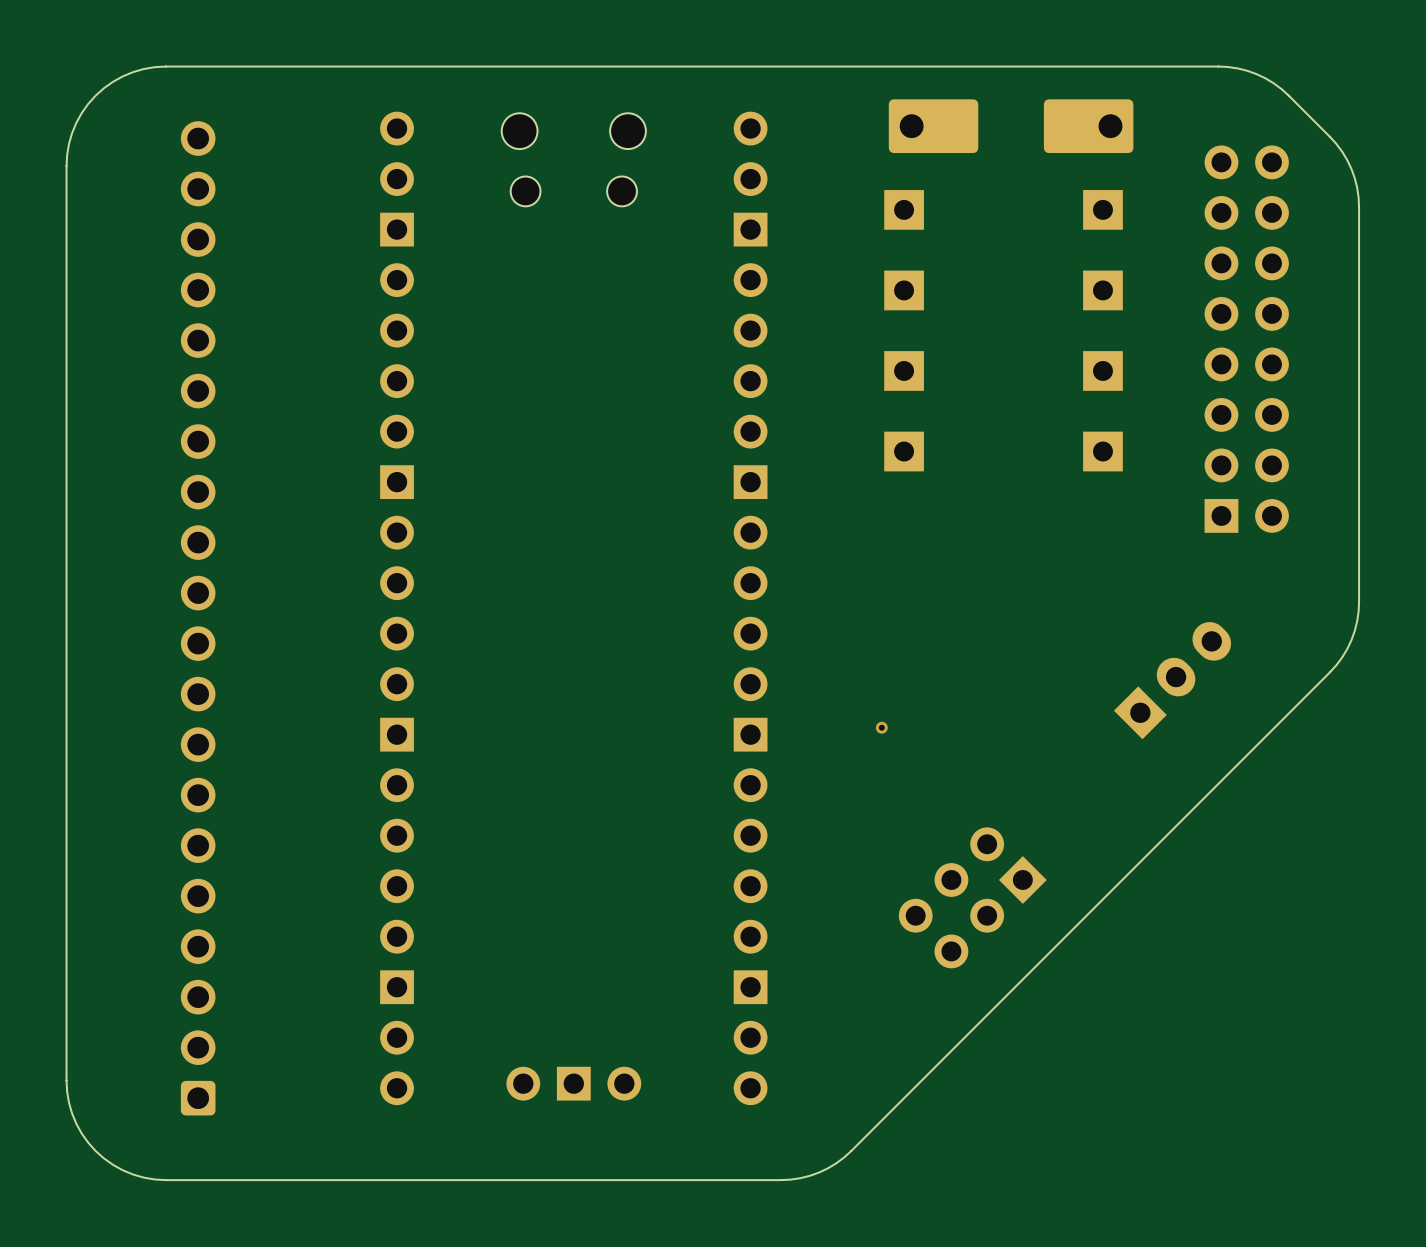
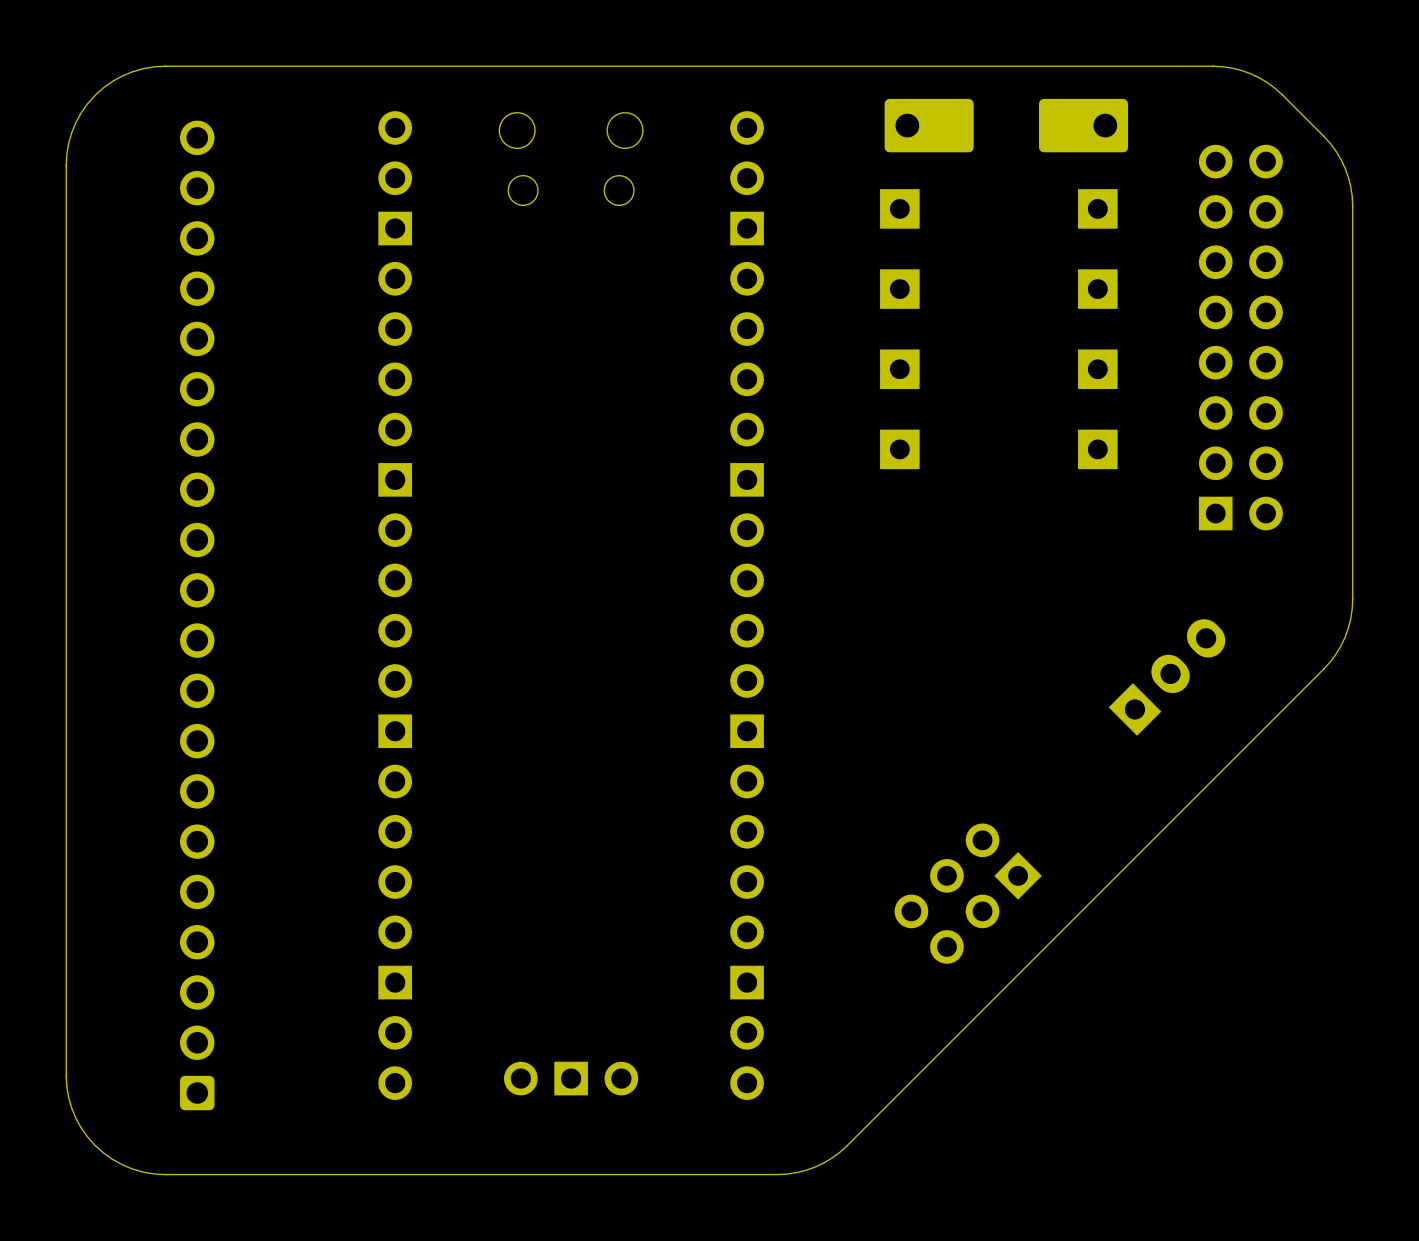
via: (881, 727) -> none

